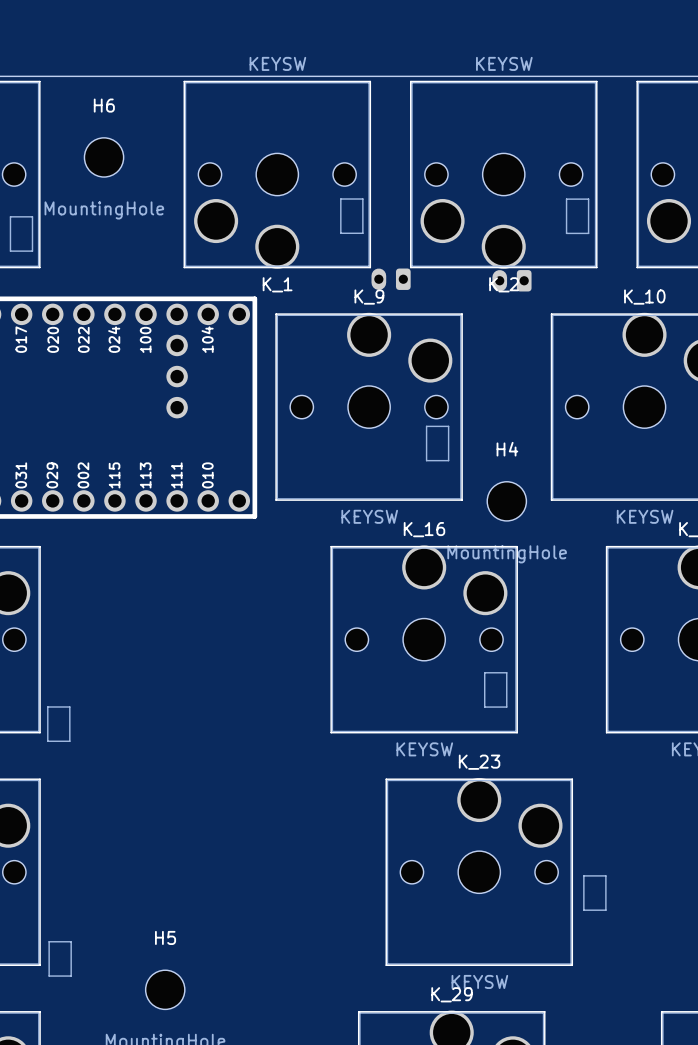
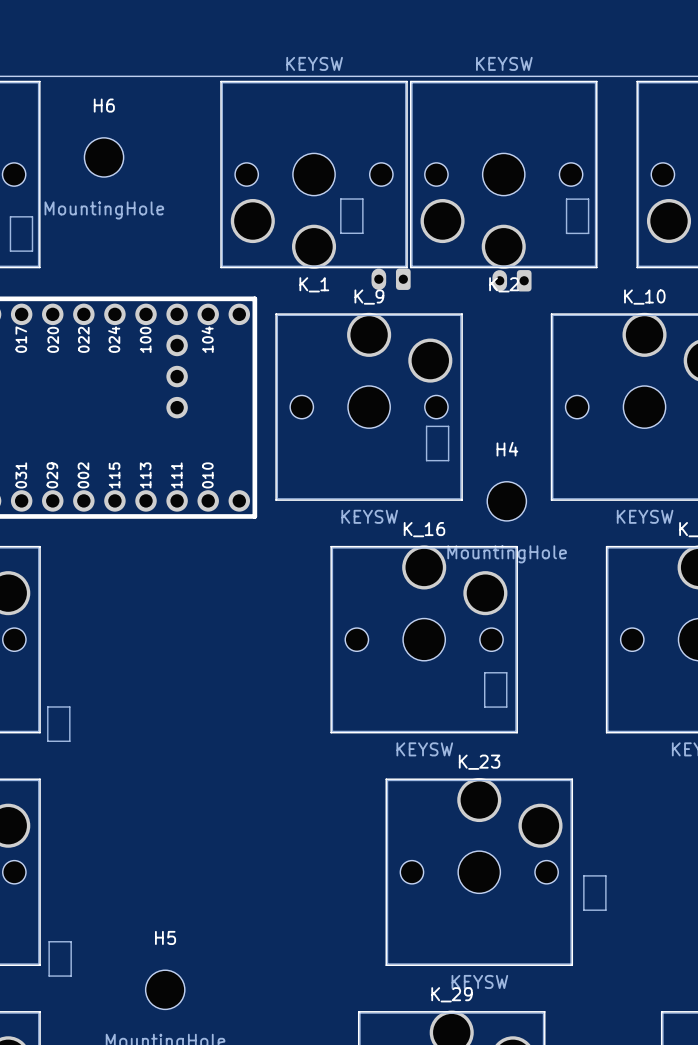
K_1 position: (277, 174) -> (314, 174)

